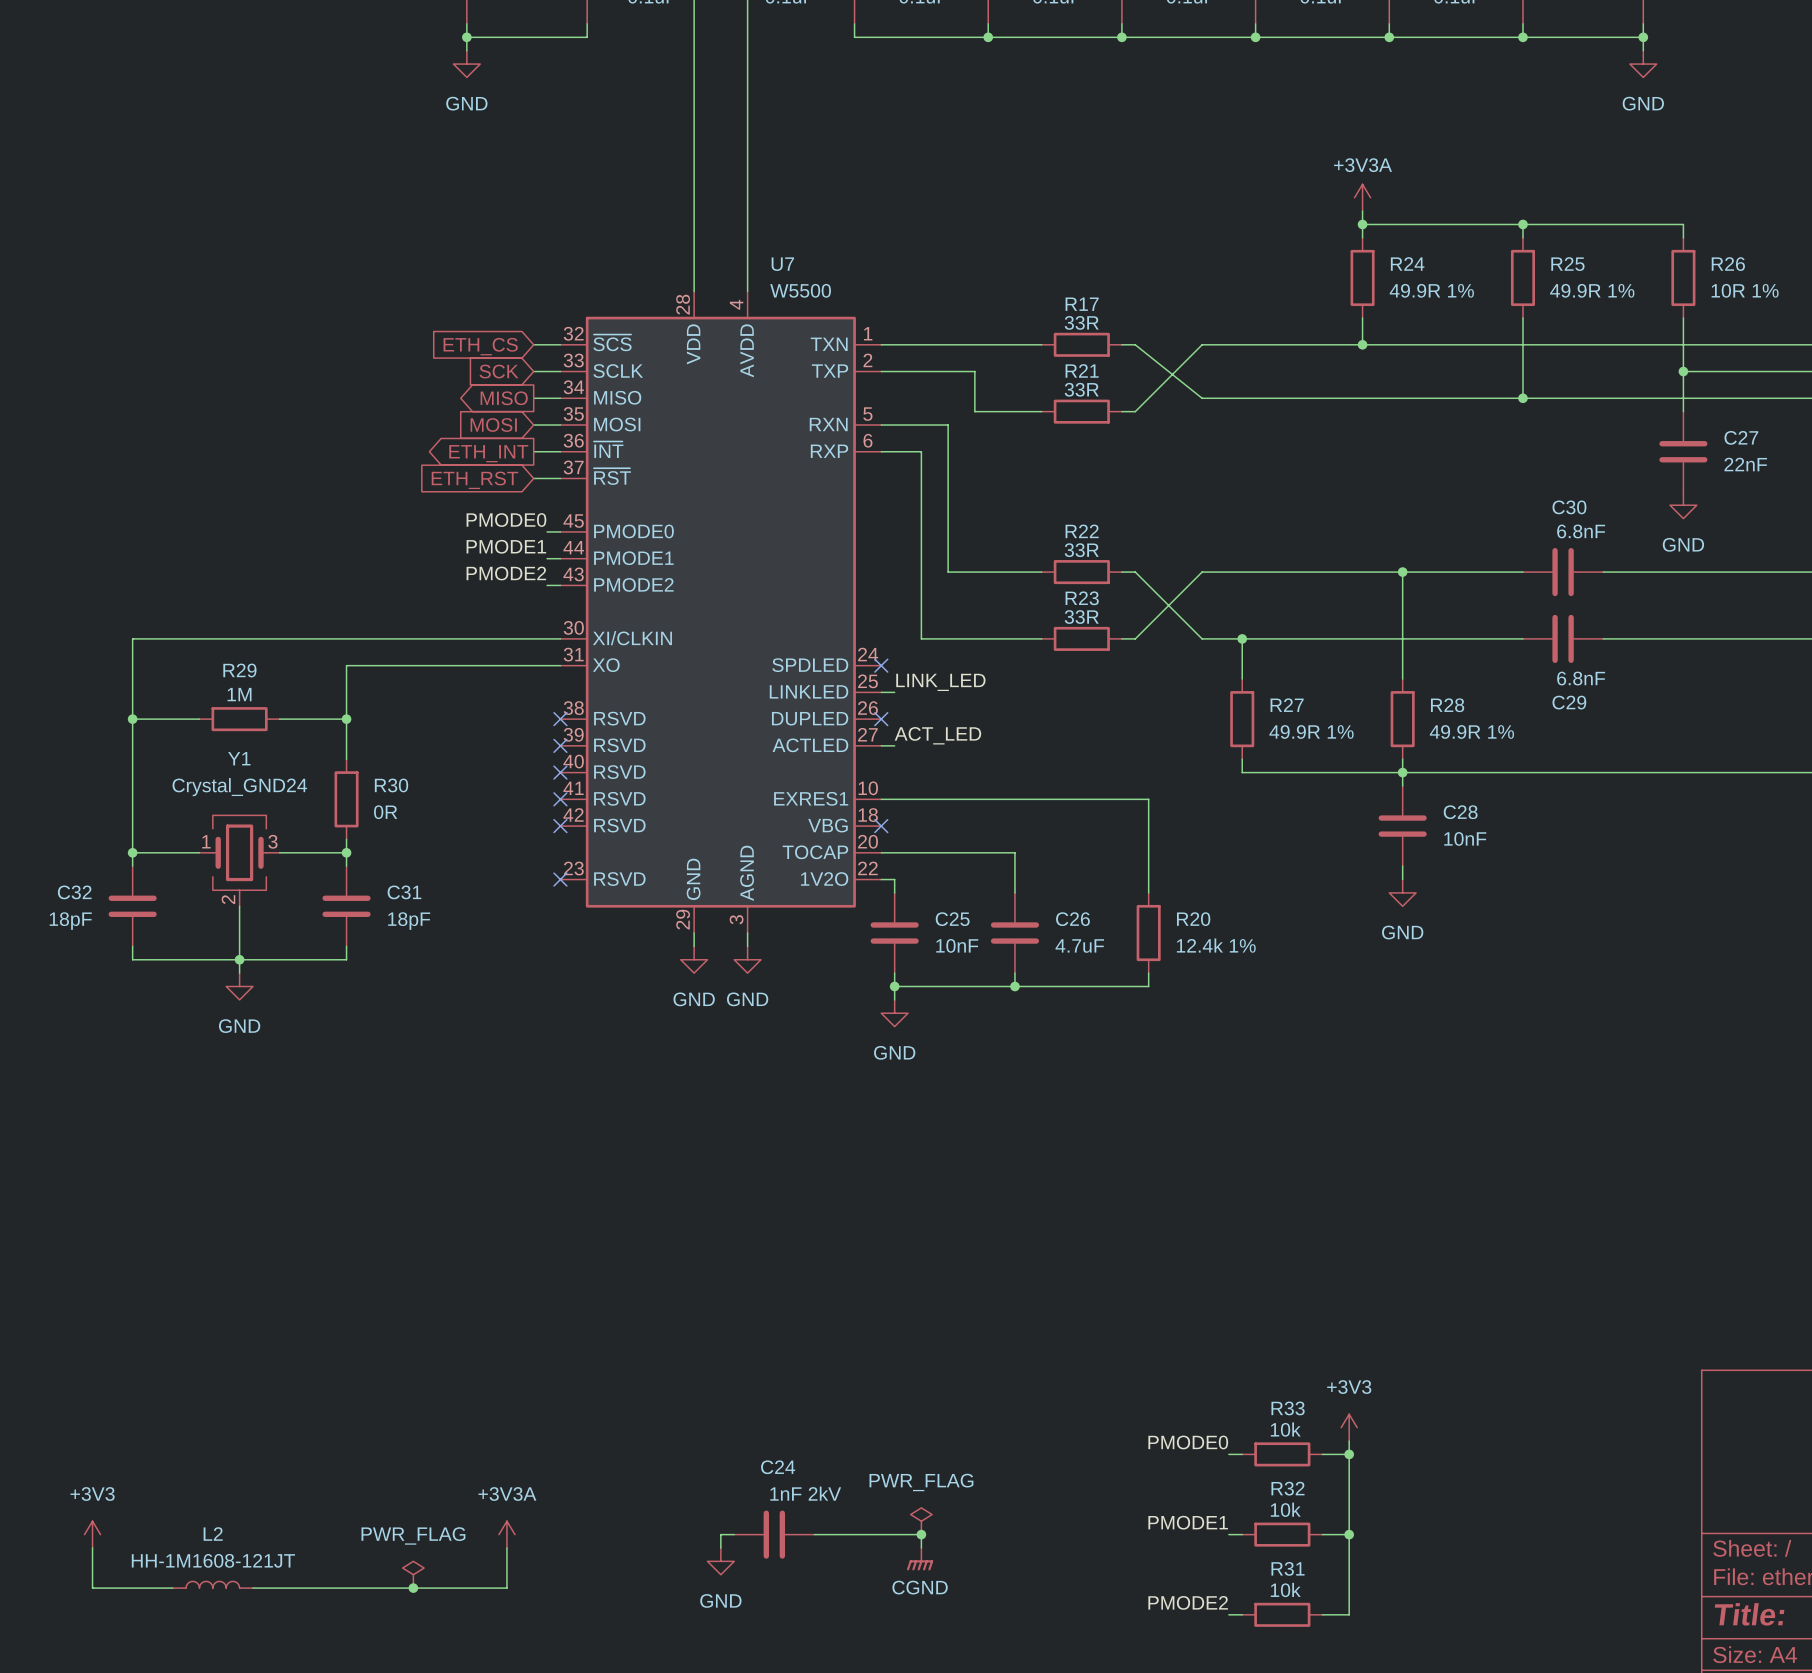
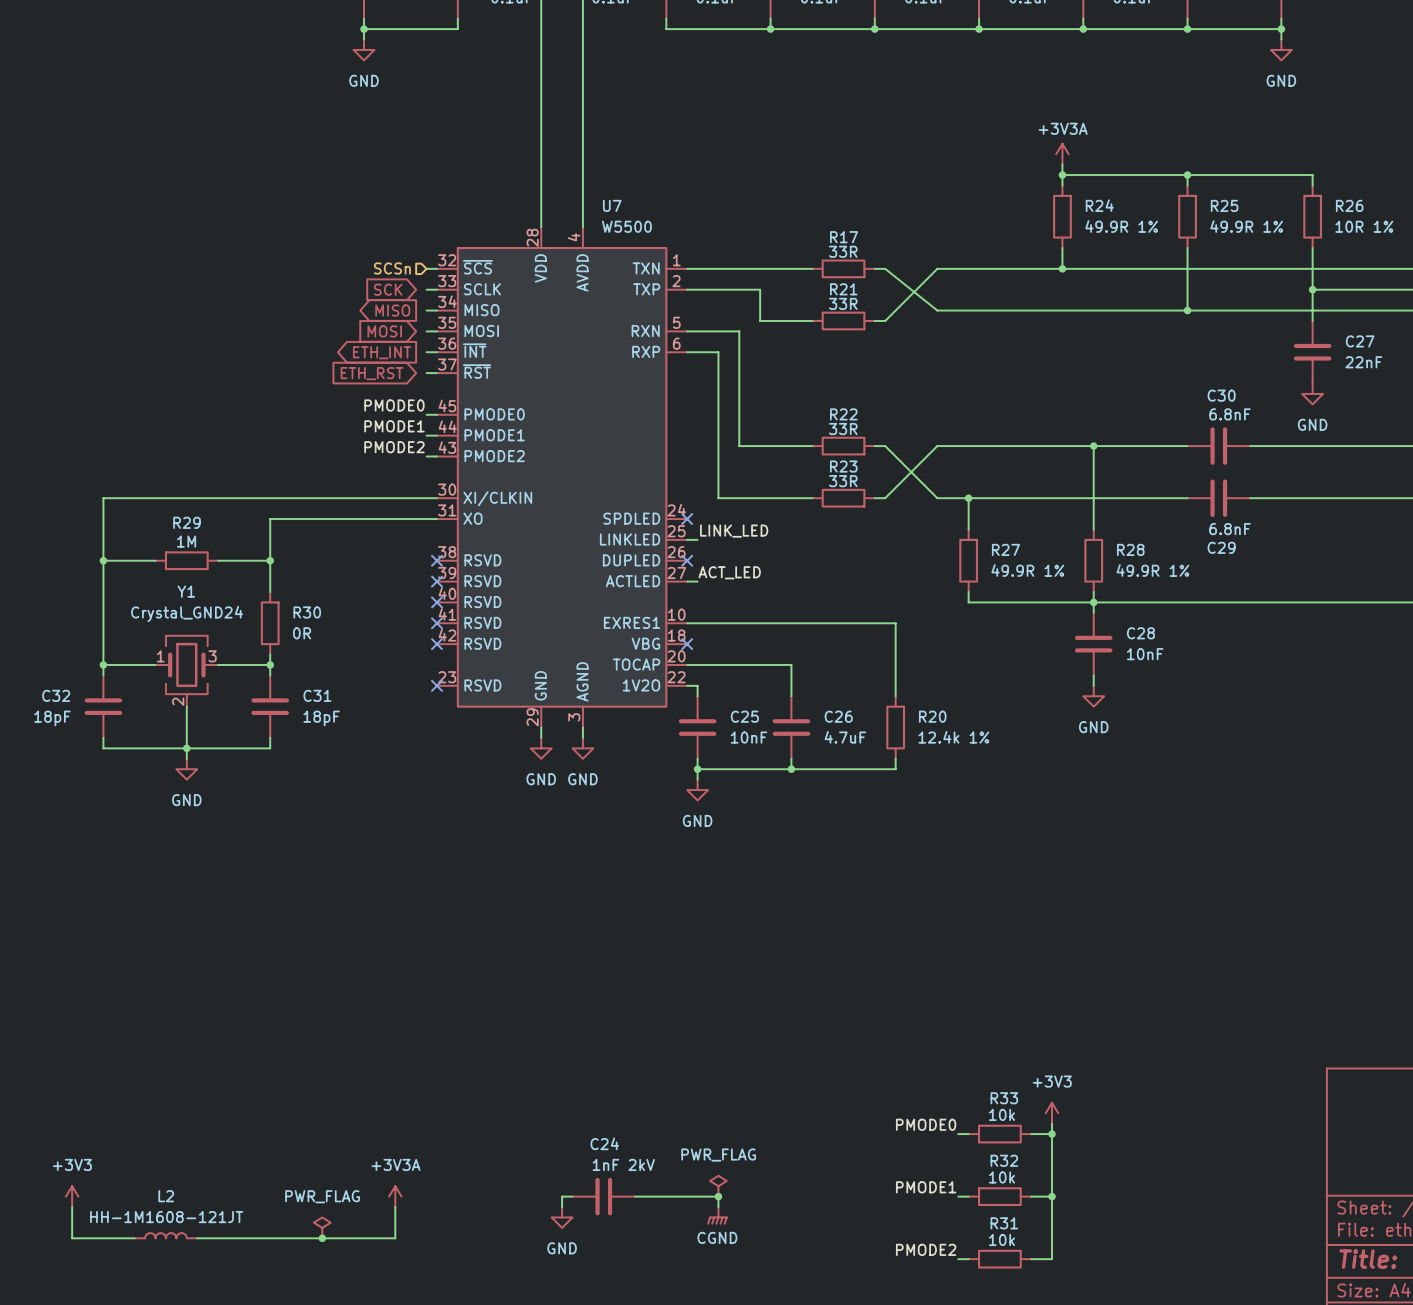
hierarchical label: none -> SCSn (392, 268)
wire: (533, 344) (547, 344) -> none
global label: ETH_CS (480, 346) -> none
wire: (533, 371) (547, 371) -> none
wire: (533, 398) (547, 398) -> none
wire: (533, 425) (547, 425) -> none
wire: (533, 451) (547, 451) -> none
wire: (533, 478) (547, 478) -> none

